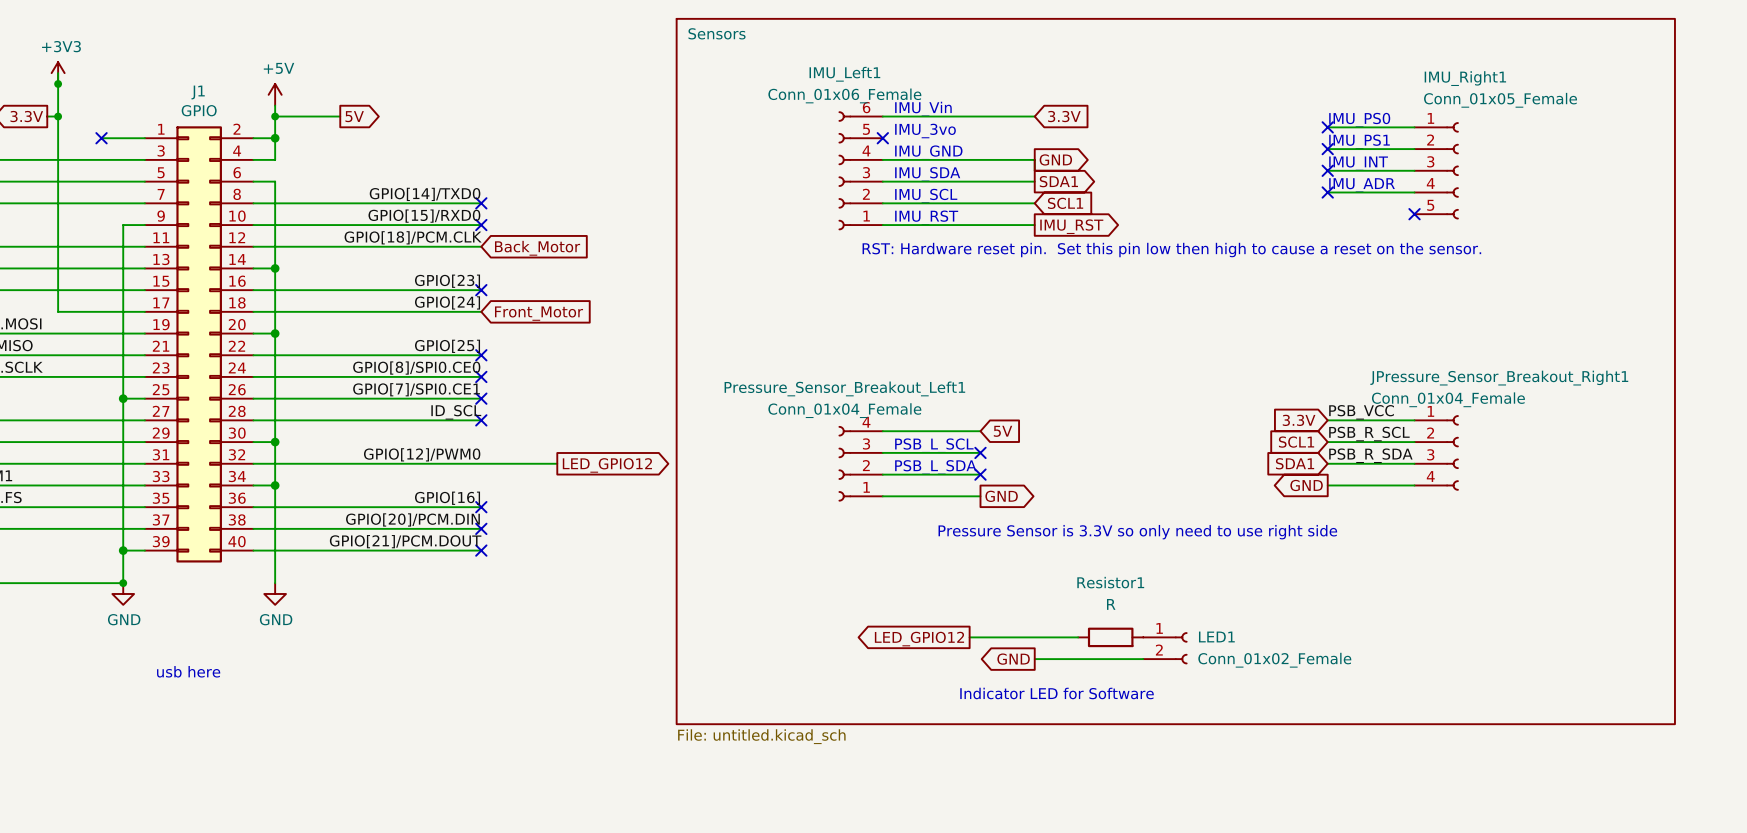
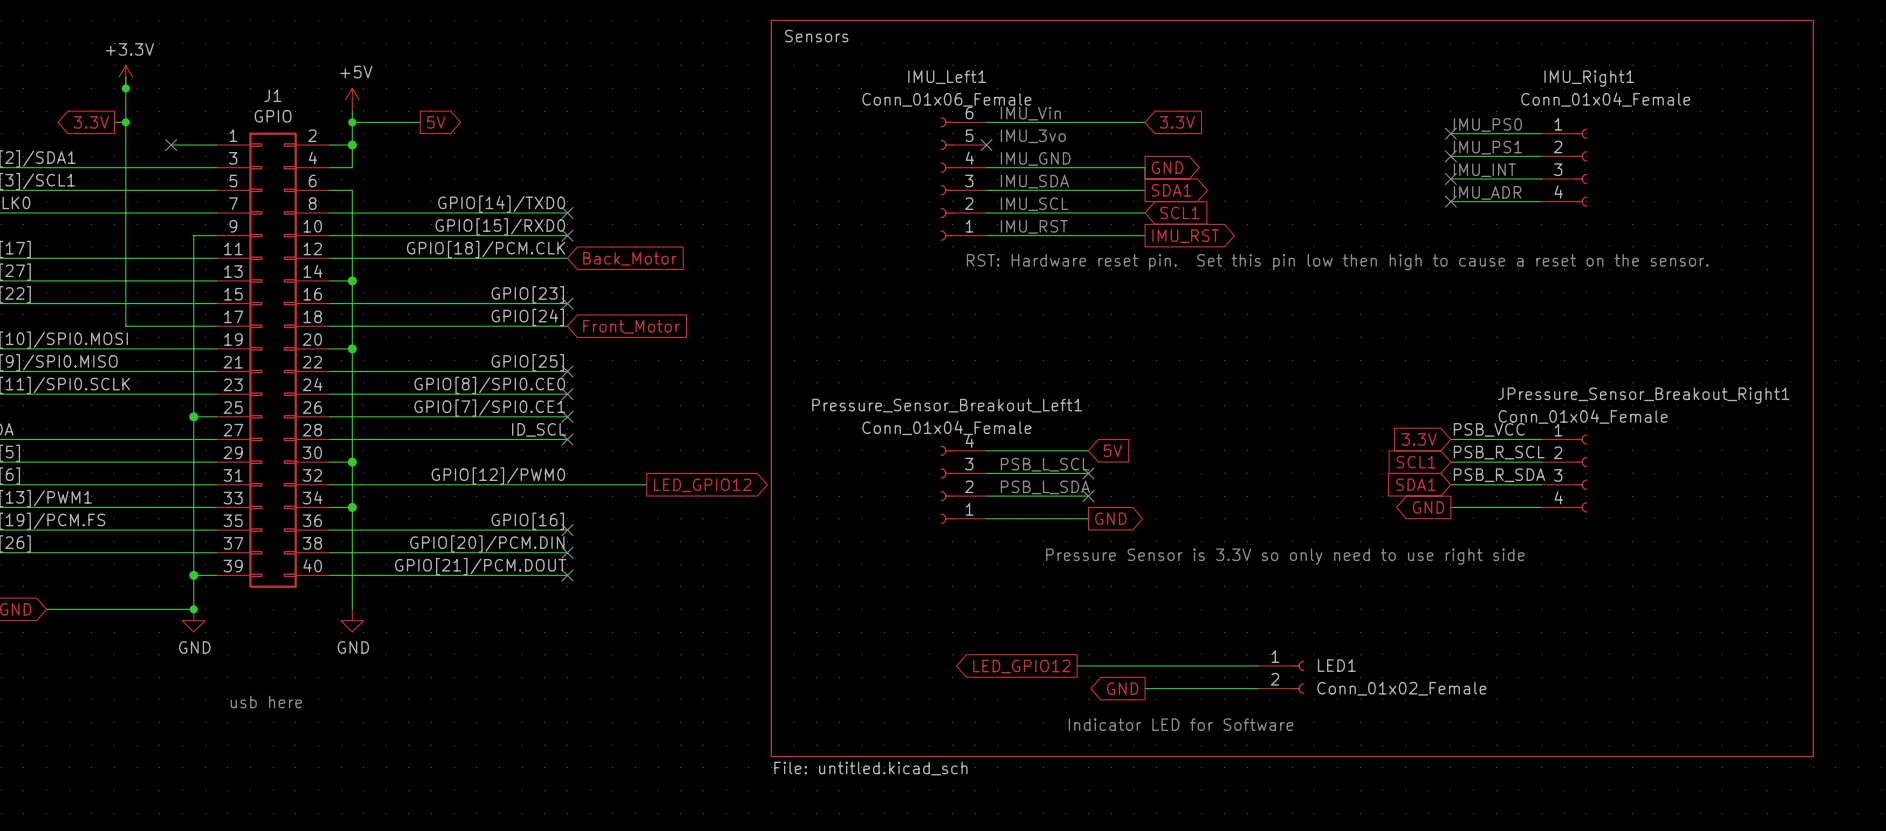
power symbol: +3V3 (58, 73) -> +3.3V (125, 77)
IMU_Right1 value: Conn_01x05_Female (1500, 100) -> Conn_01x04_Female (1605, 99)
IMU_Right1 symbol: [1414, 122, 1459, 220] -> [1541, 128, 1588, 207]
no-connect mark: (1414, 214) -> none
wire: none -> (1190, 665) (1258, 665)
Resistor1: R (1110, 637) -> none

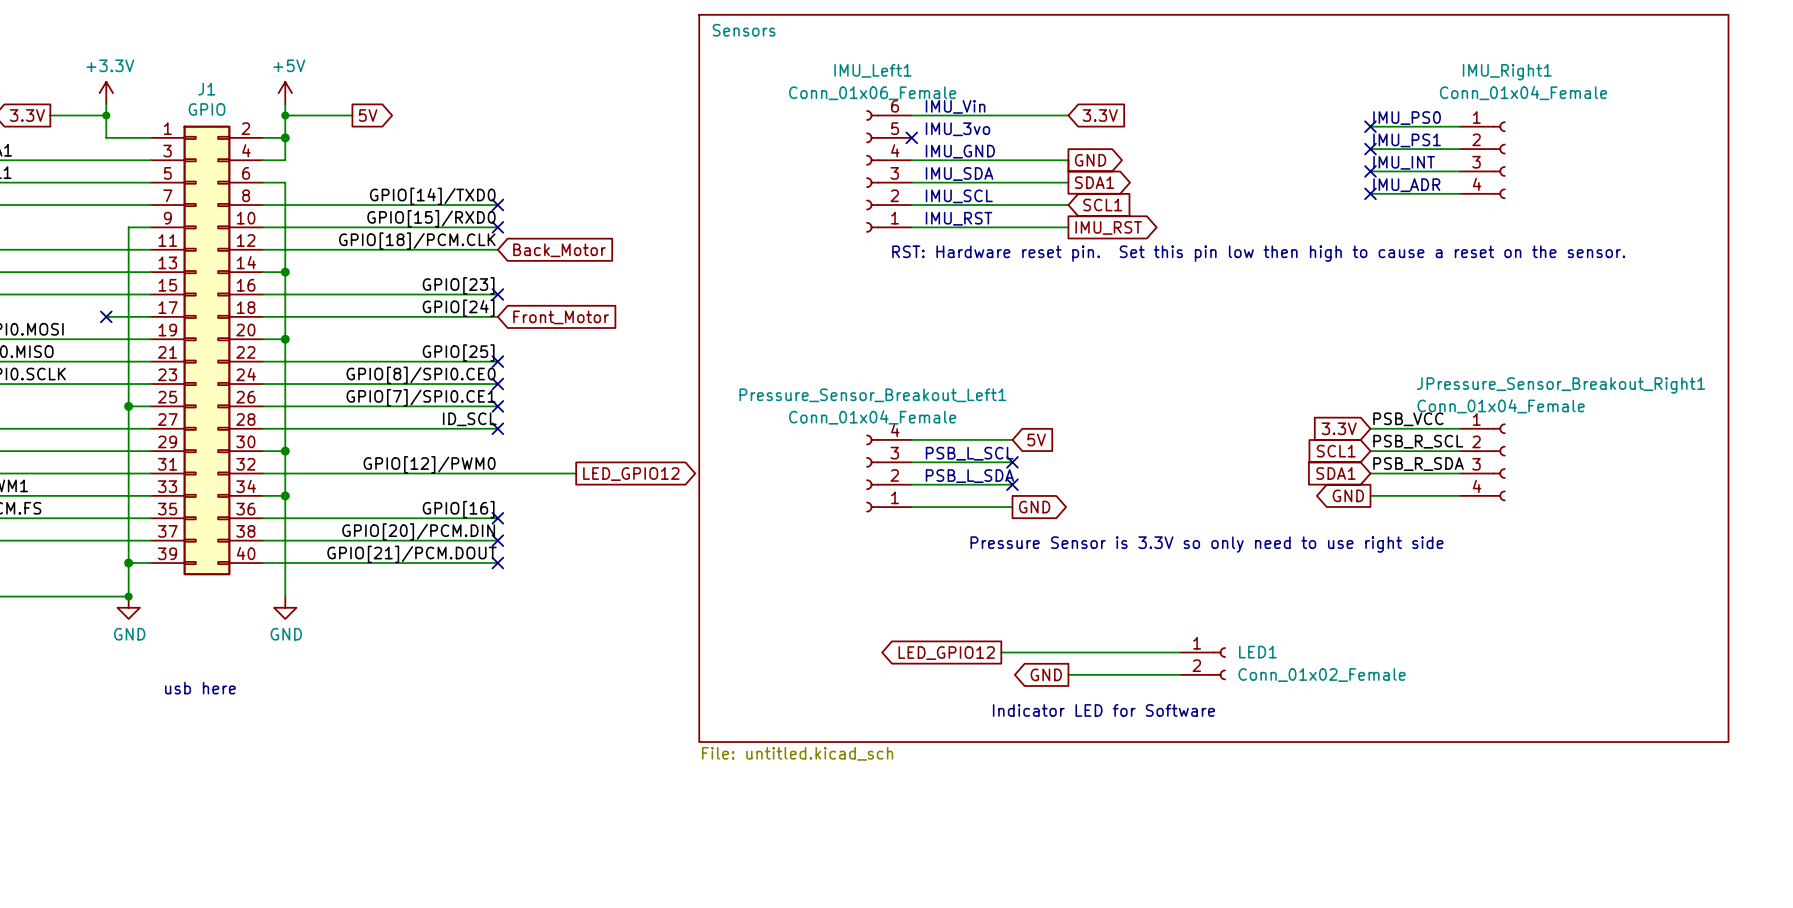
wire: (125, 77) (125, 326) (171, 326) -> none
power symbol position: +3.3V (125, 77) -> +3.3V (106, 93)
junction: (125, 88) -> none
wire: none -> (106, 104) (106, 137)
wire: none -> (61, 115) (106, 115)
junction: (125, 122) -> none
junction: none -> (106, 115)
no-connect mark: (171, 145) -> none
no-connect mark: none -> (106, 316)

